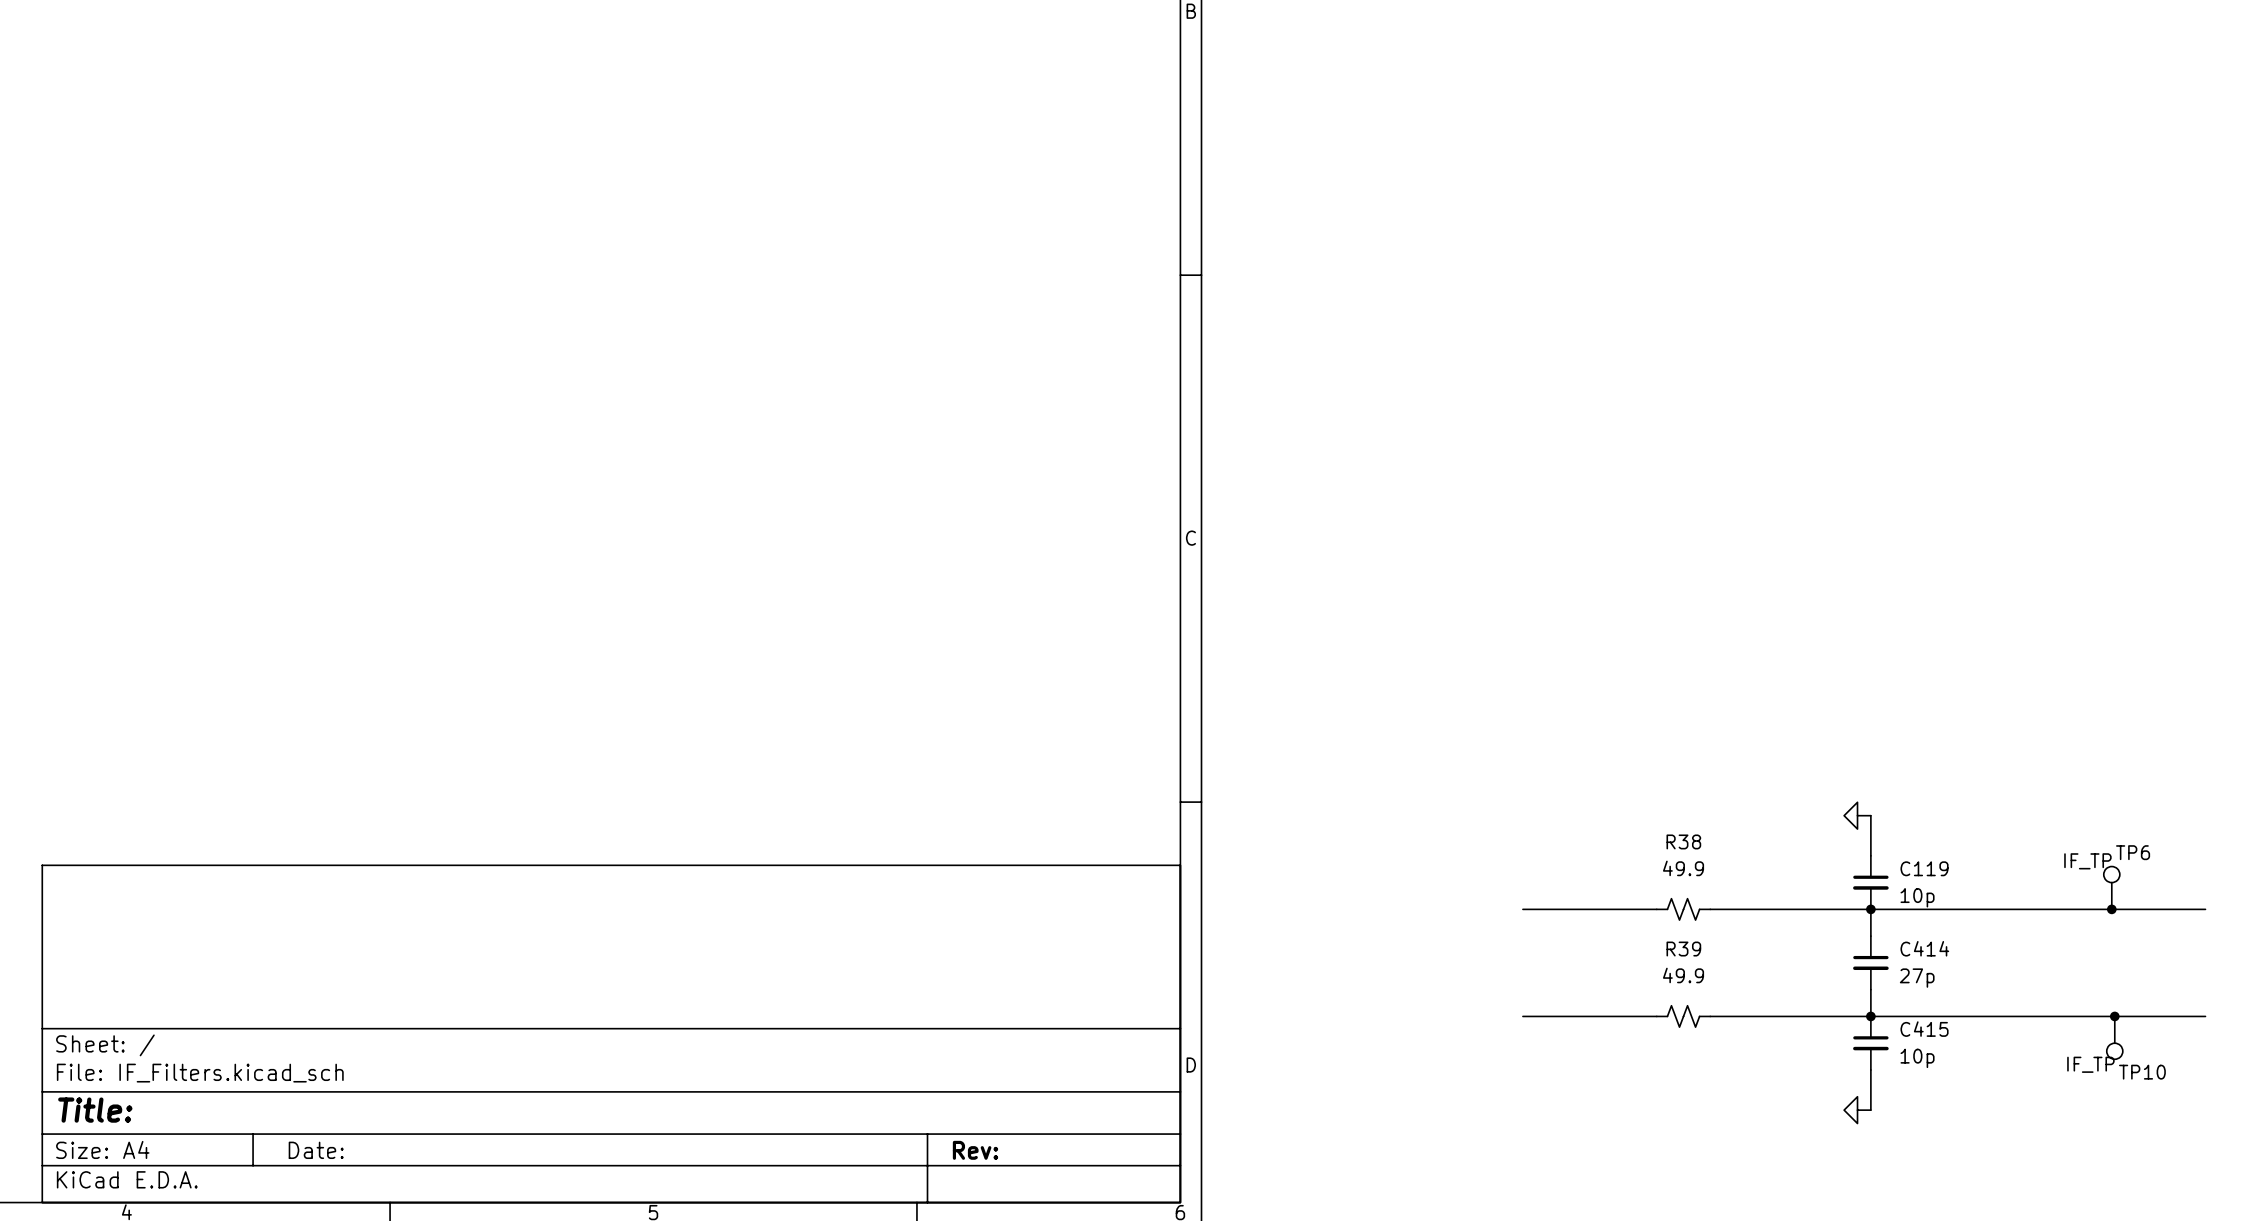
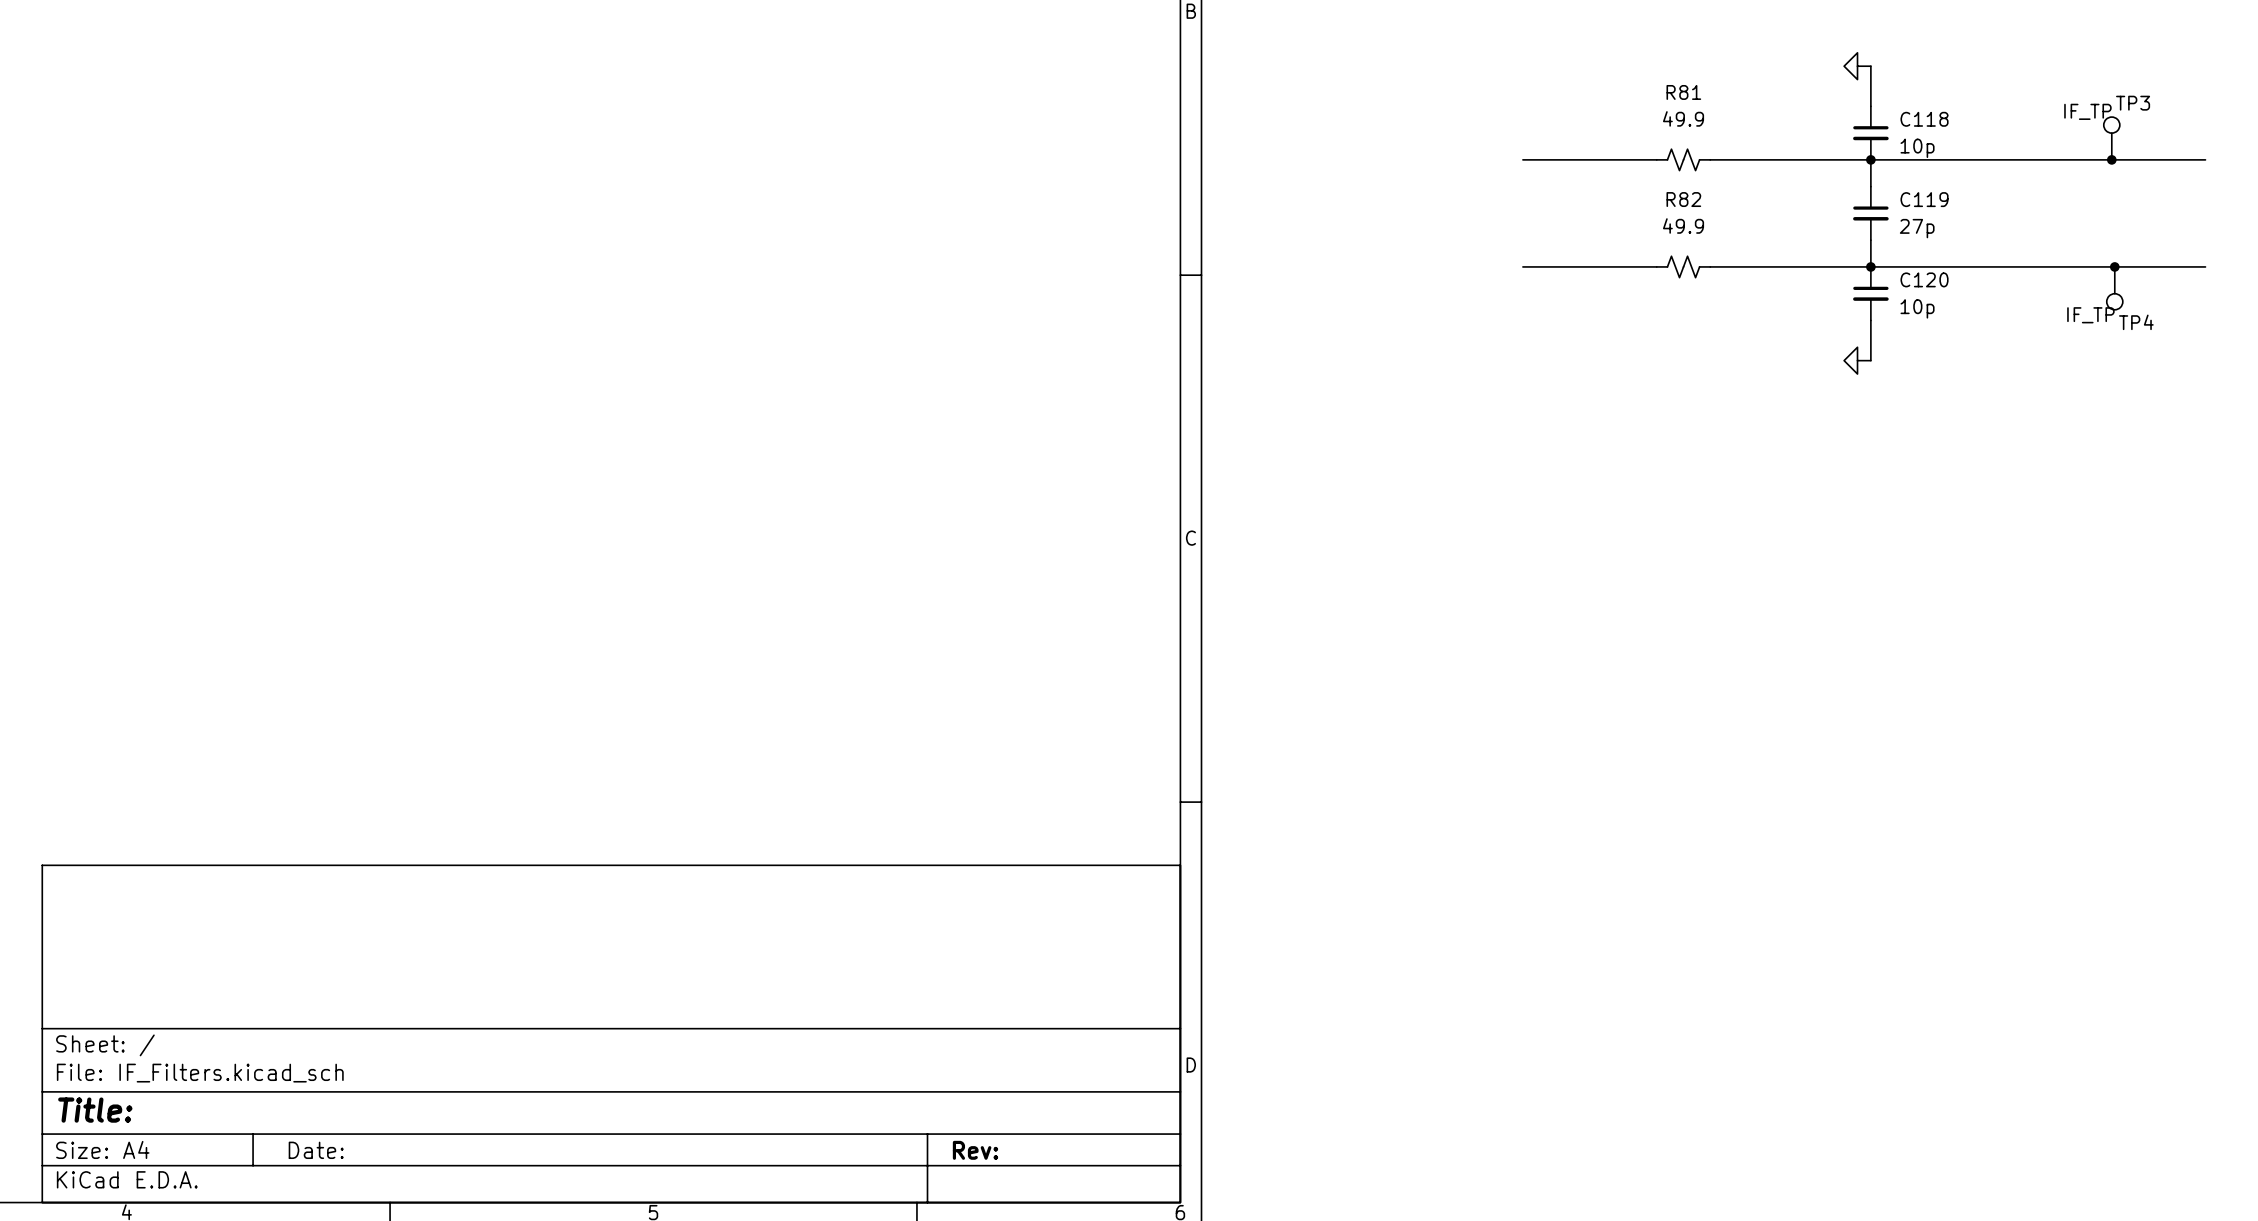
power symbol: none -> (1857, 66)
wire: none -> (1870, 66) (1870, 106)
C118: none -> 10p (1870, 133)
TP3: none -> IF_TP (2111, 138)
wire: none -> (1522, 159) (1656, 159)
R81: none -> 49.9 (1683, 159)
wire: none -> (1710, 159) (2205, 159)
wire: none -> (1870, 159) (1870, 186)
junction: none -> (1870, 159)
junction: none -> (2111, 159)
wire: none -> (1870, 240) (1870, 266)
wire: none -> (1522, 266) (1656, 266)
R82: none -> 49.9 (1683, 266)
wire: none -> (1710, 266) (2205, 266)
junction: none -> (1870, 266)
junction: none -> (2114, 266)
TP4: none -> IF_TP (2114, 288)
C120: none -> 10p (1870, 293)
wire: none -> (1870, 320) (1870, 360)
power symbol: none -> (1857, 360)
power symbol: (1857, 815) -> none
wire: (1870, 815) (1870, 855) -> none
C119 position: (1870, 882) -> (1870, 213)
TP6: IF_TP (2111, 887) -> none
C119 value: 10p (1917, 897) -> 27p (1917, 228)
wire: (1522, 909) (1656, 909) -> none
R38: 49.9 (1683, 909) -> none
wire: (1710, 909) (2205, 909) -> none
wire: (1870, 909) (1870, 936) -> none
junction: (1870, 909) -> none
junction: (2111, 909) -> none
C414: 27p (1870, 962) -> none
wire: (1870, 989) (1870, 1016) -> none
wire: (1522, 1016) (1656, 1016) -> none
R39: 49.9 (1683, 1016) -> none
wire: (1710, 1016) (2205, 1016) -> none
junction: (1870, 1016) -> none
junction: (2114, 1016) -> none
TP10: IF_TP (2114, 1037) -> none
C415: 10p (1870, 1043) -> none
wire: (1870, 1069) (1870, 1110) -> none
power symbol: (1857, 1110) -> none

